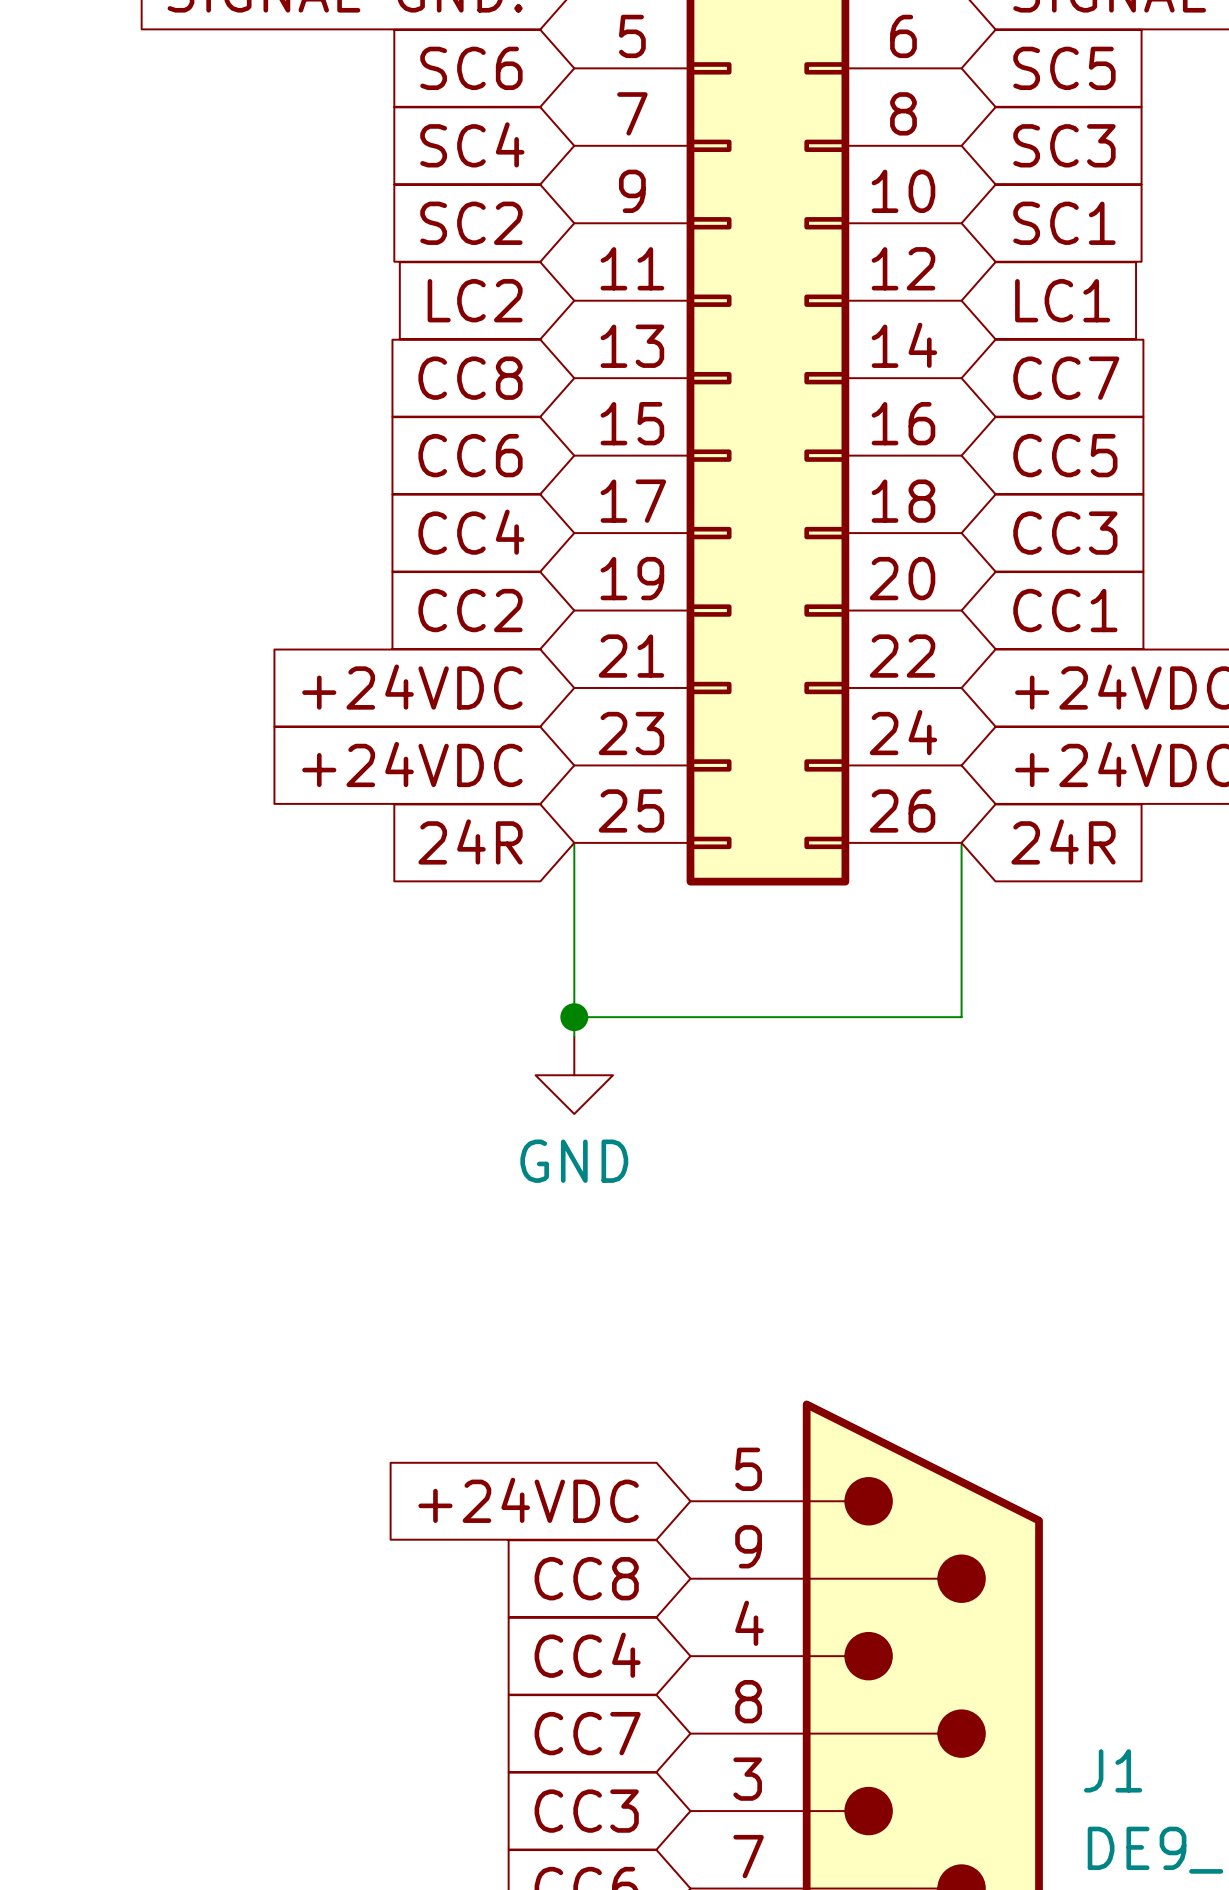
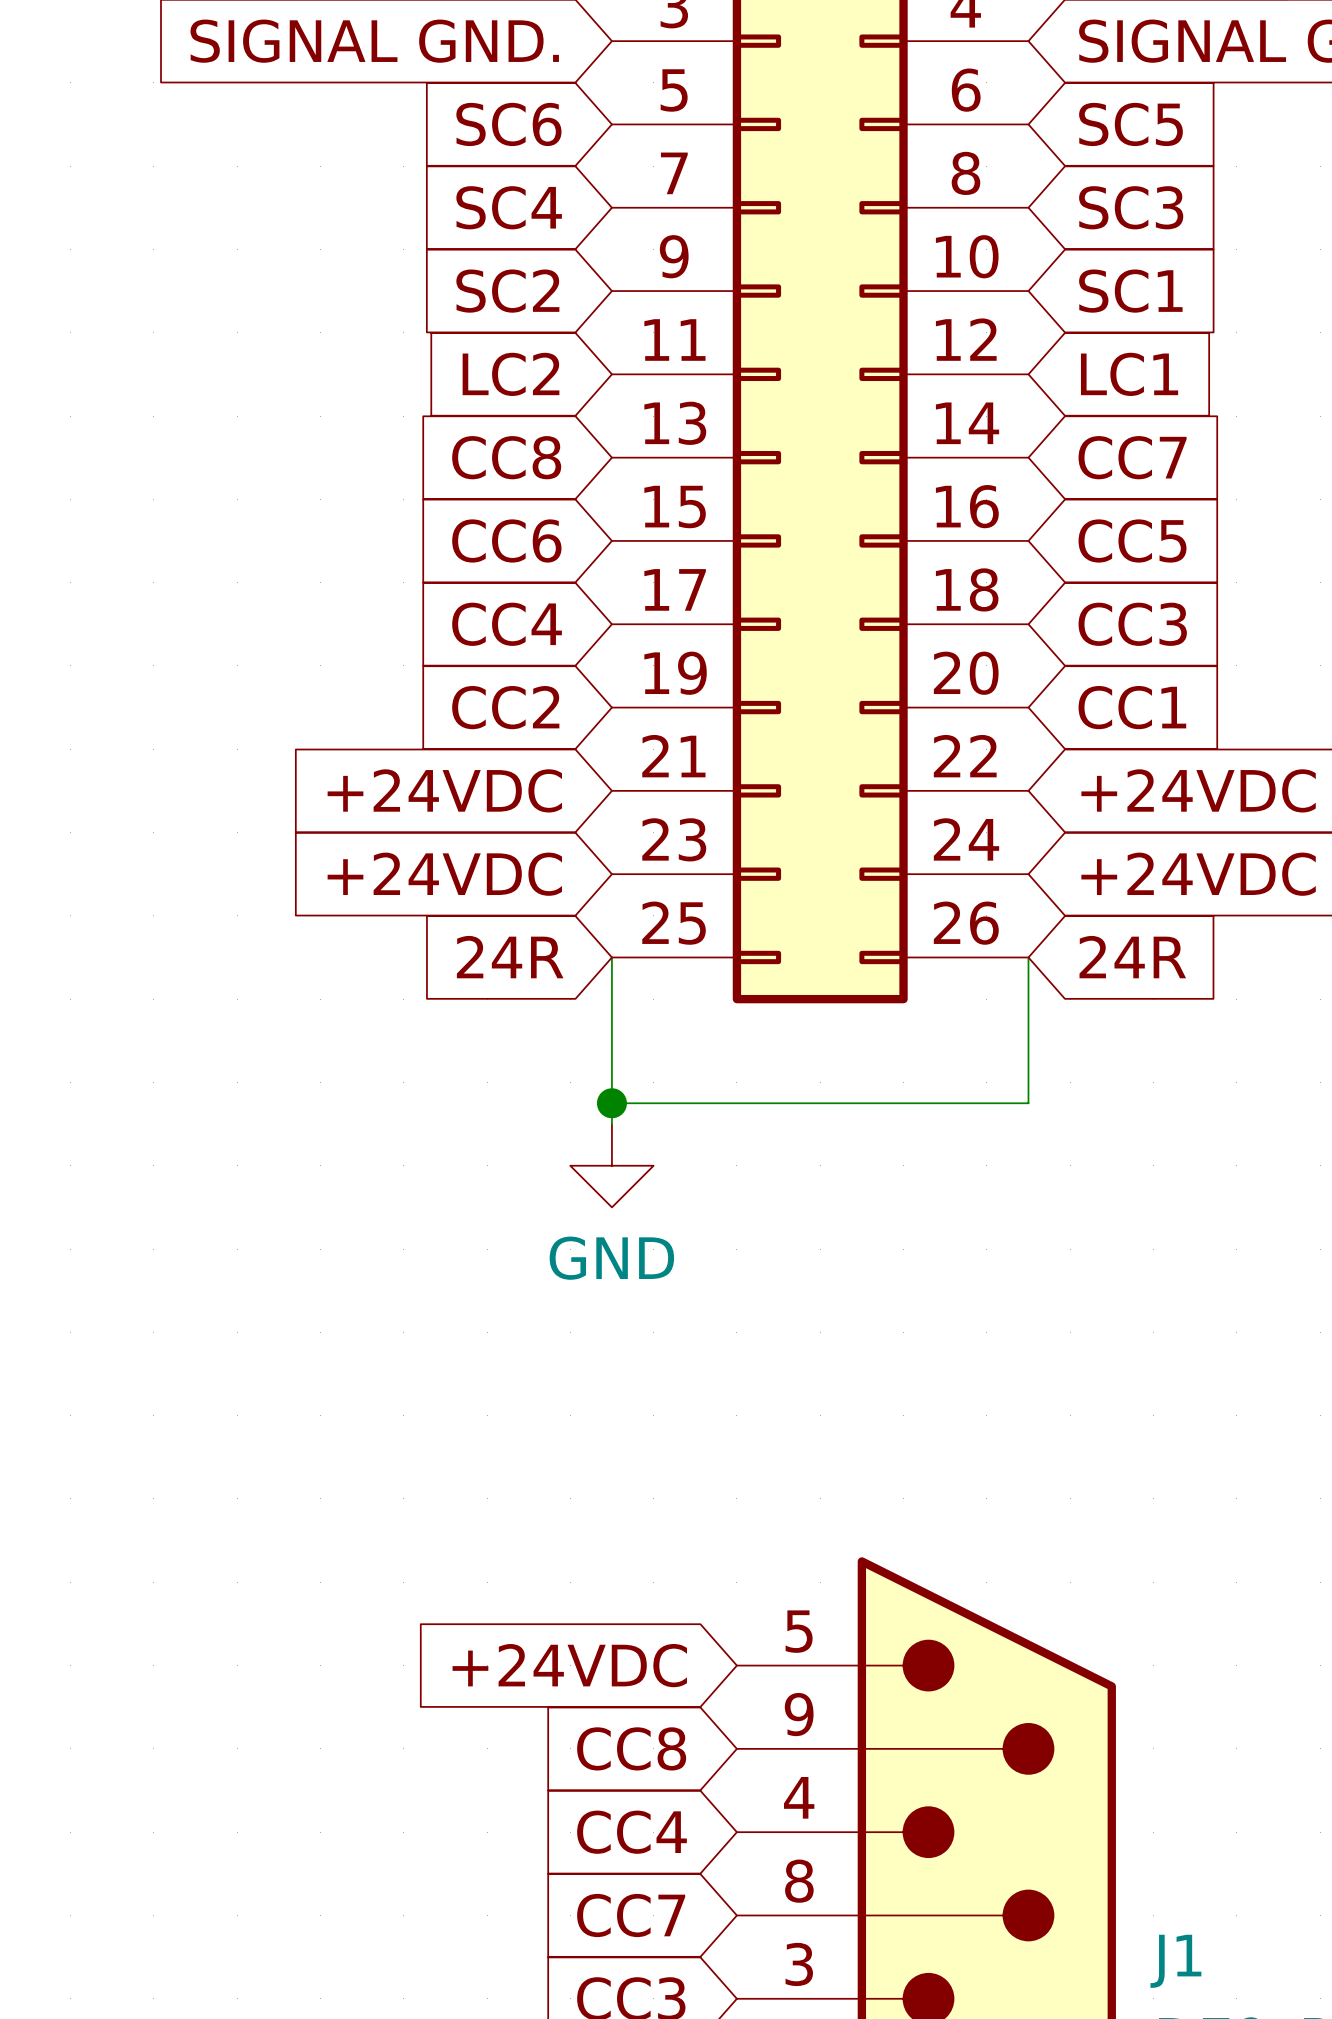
wire: (961, 978) (961, 1017) (574, 1017) -> (1028, 1103) (611, 1103)
junction position: (574, 1017) -> (611, 1103)
power symbol position: GND (574, 1075) -> GND (611, 1165)

